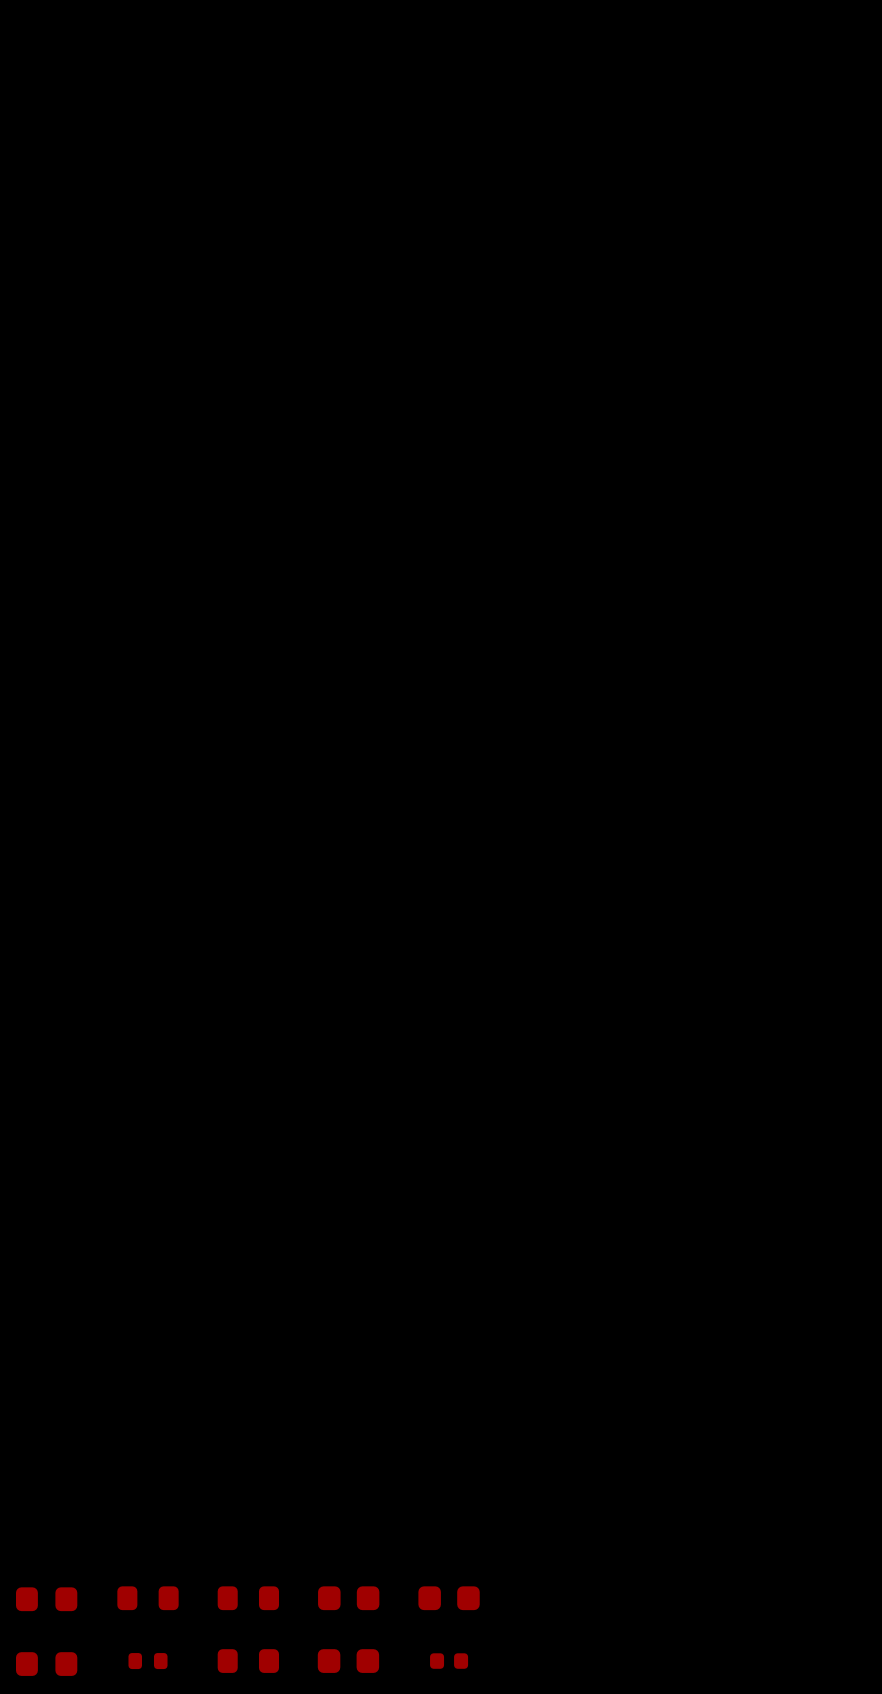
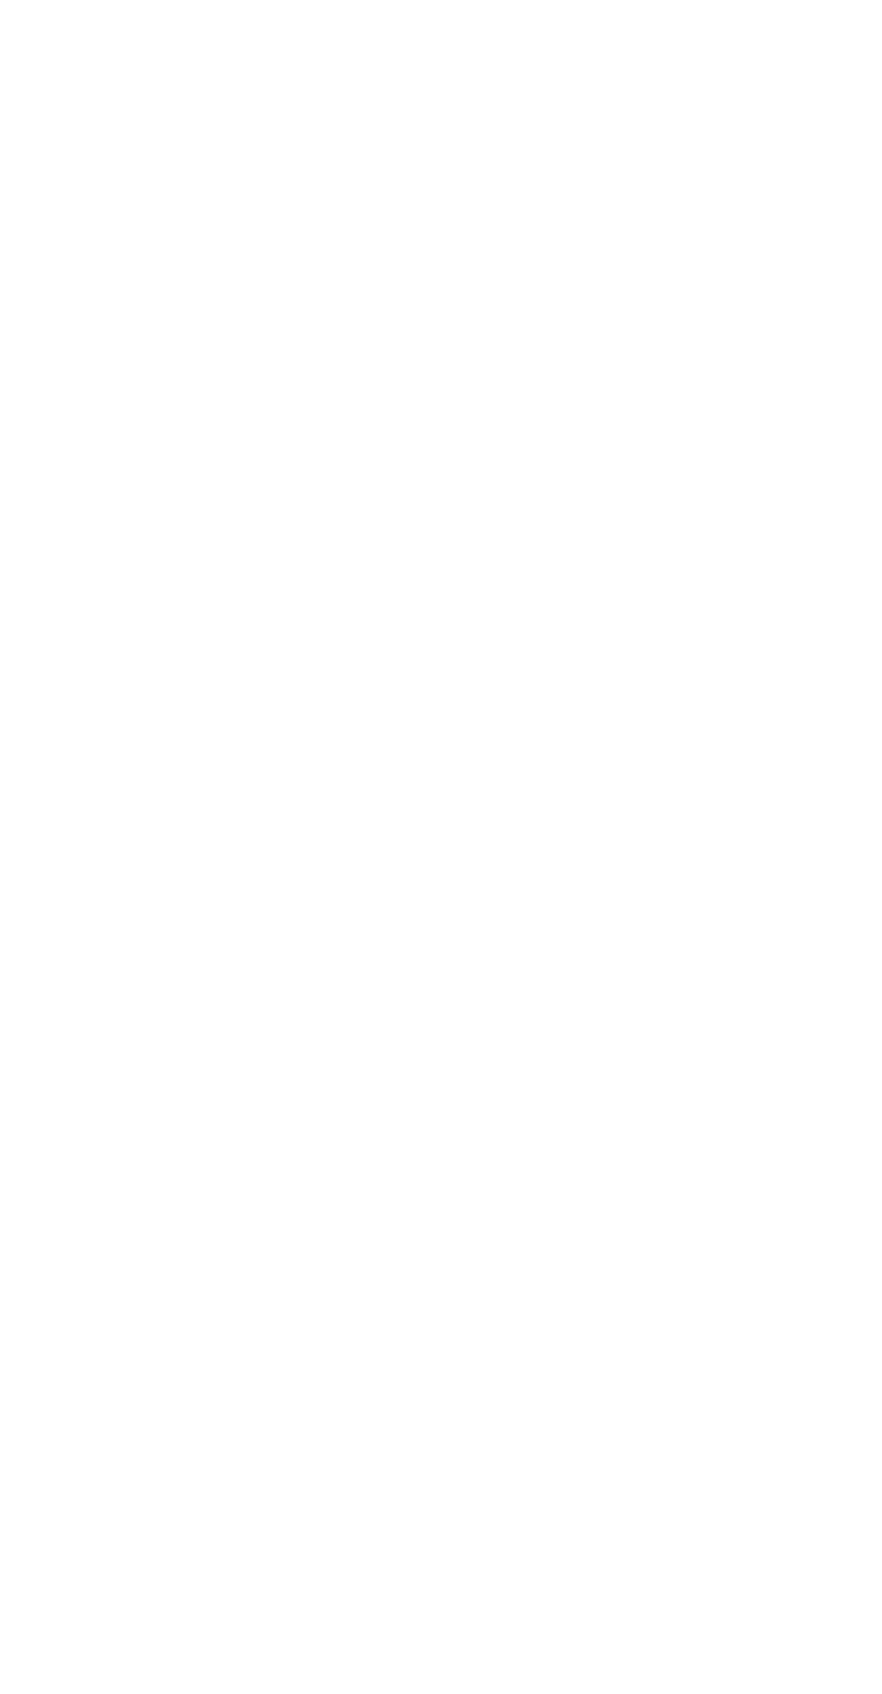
part: (148, 1598) -> none
part: (248, 1598) -> none
part: (348, 1598) -> none
part: (449, 1598) -> none
part: (46, 1599) -> none
part: (148, 1661) -> none
part: (248, 1661) -> none
part: (348, 1661) -> none
part: (449, 1661) -> none
part: (46, 1664) -> none

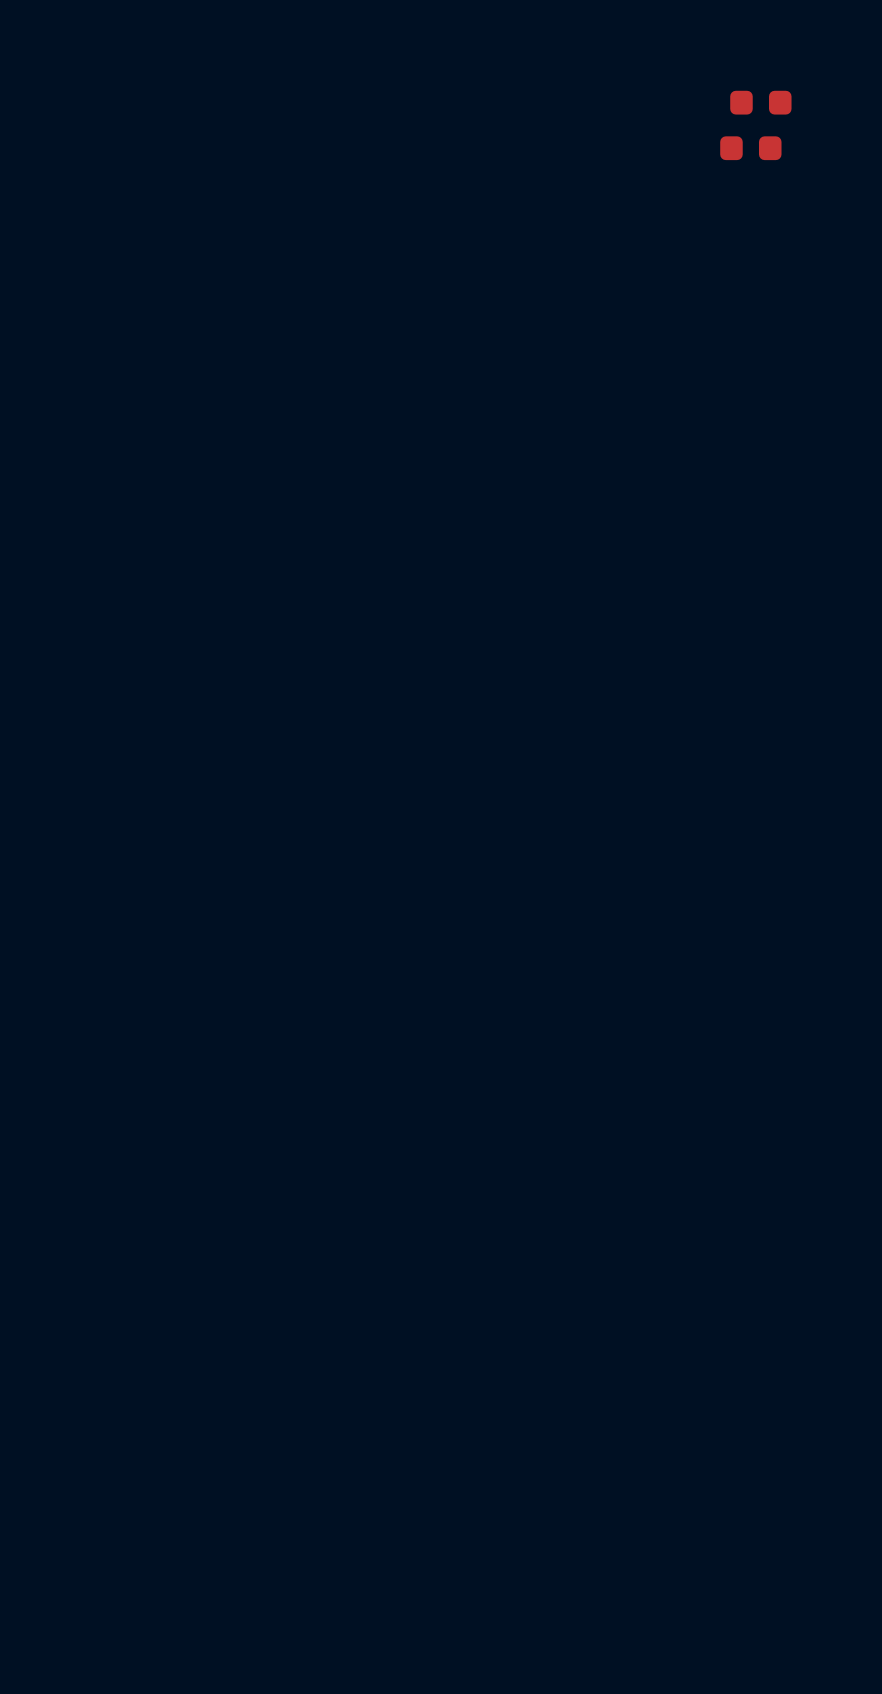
part: none -> (760, 102)
part: none -> (750, 148)

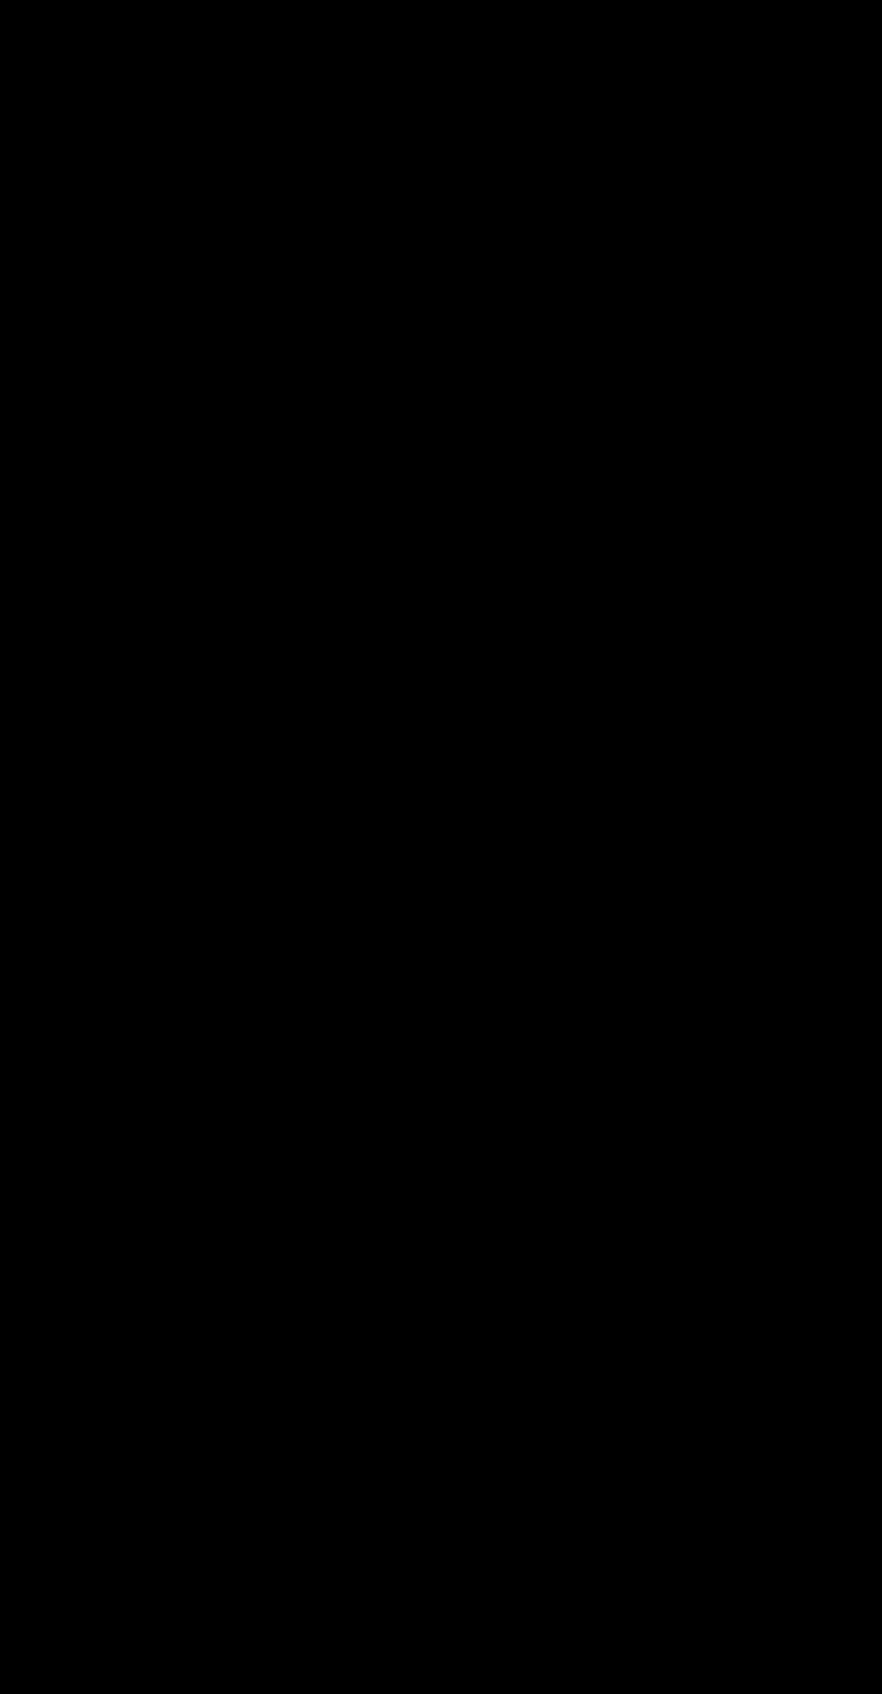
part: (760, 102) -> none
part: (750, 148) -> none

